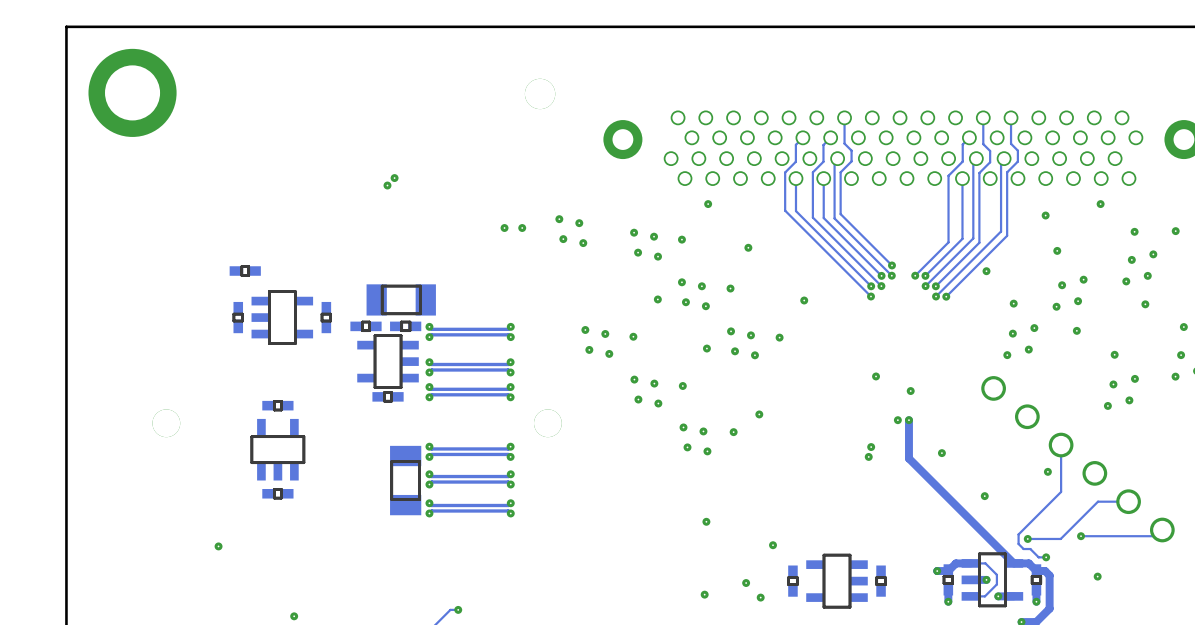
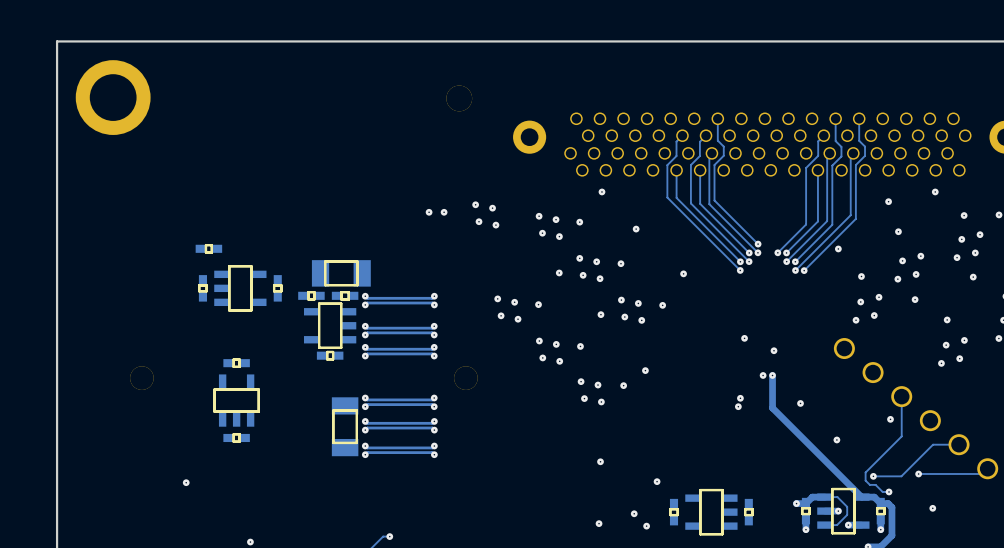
via: (394, 178) -> none
via: (387, 185) -> none

